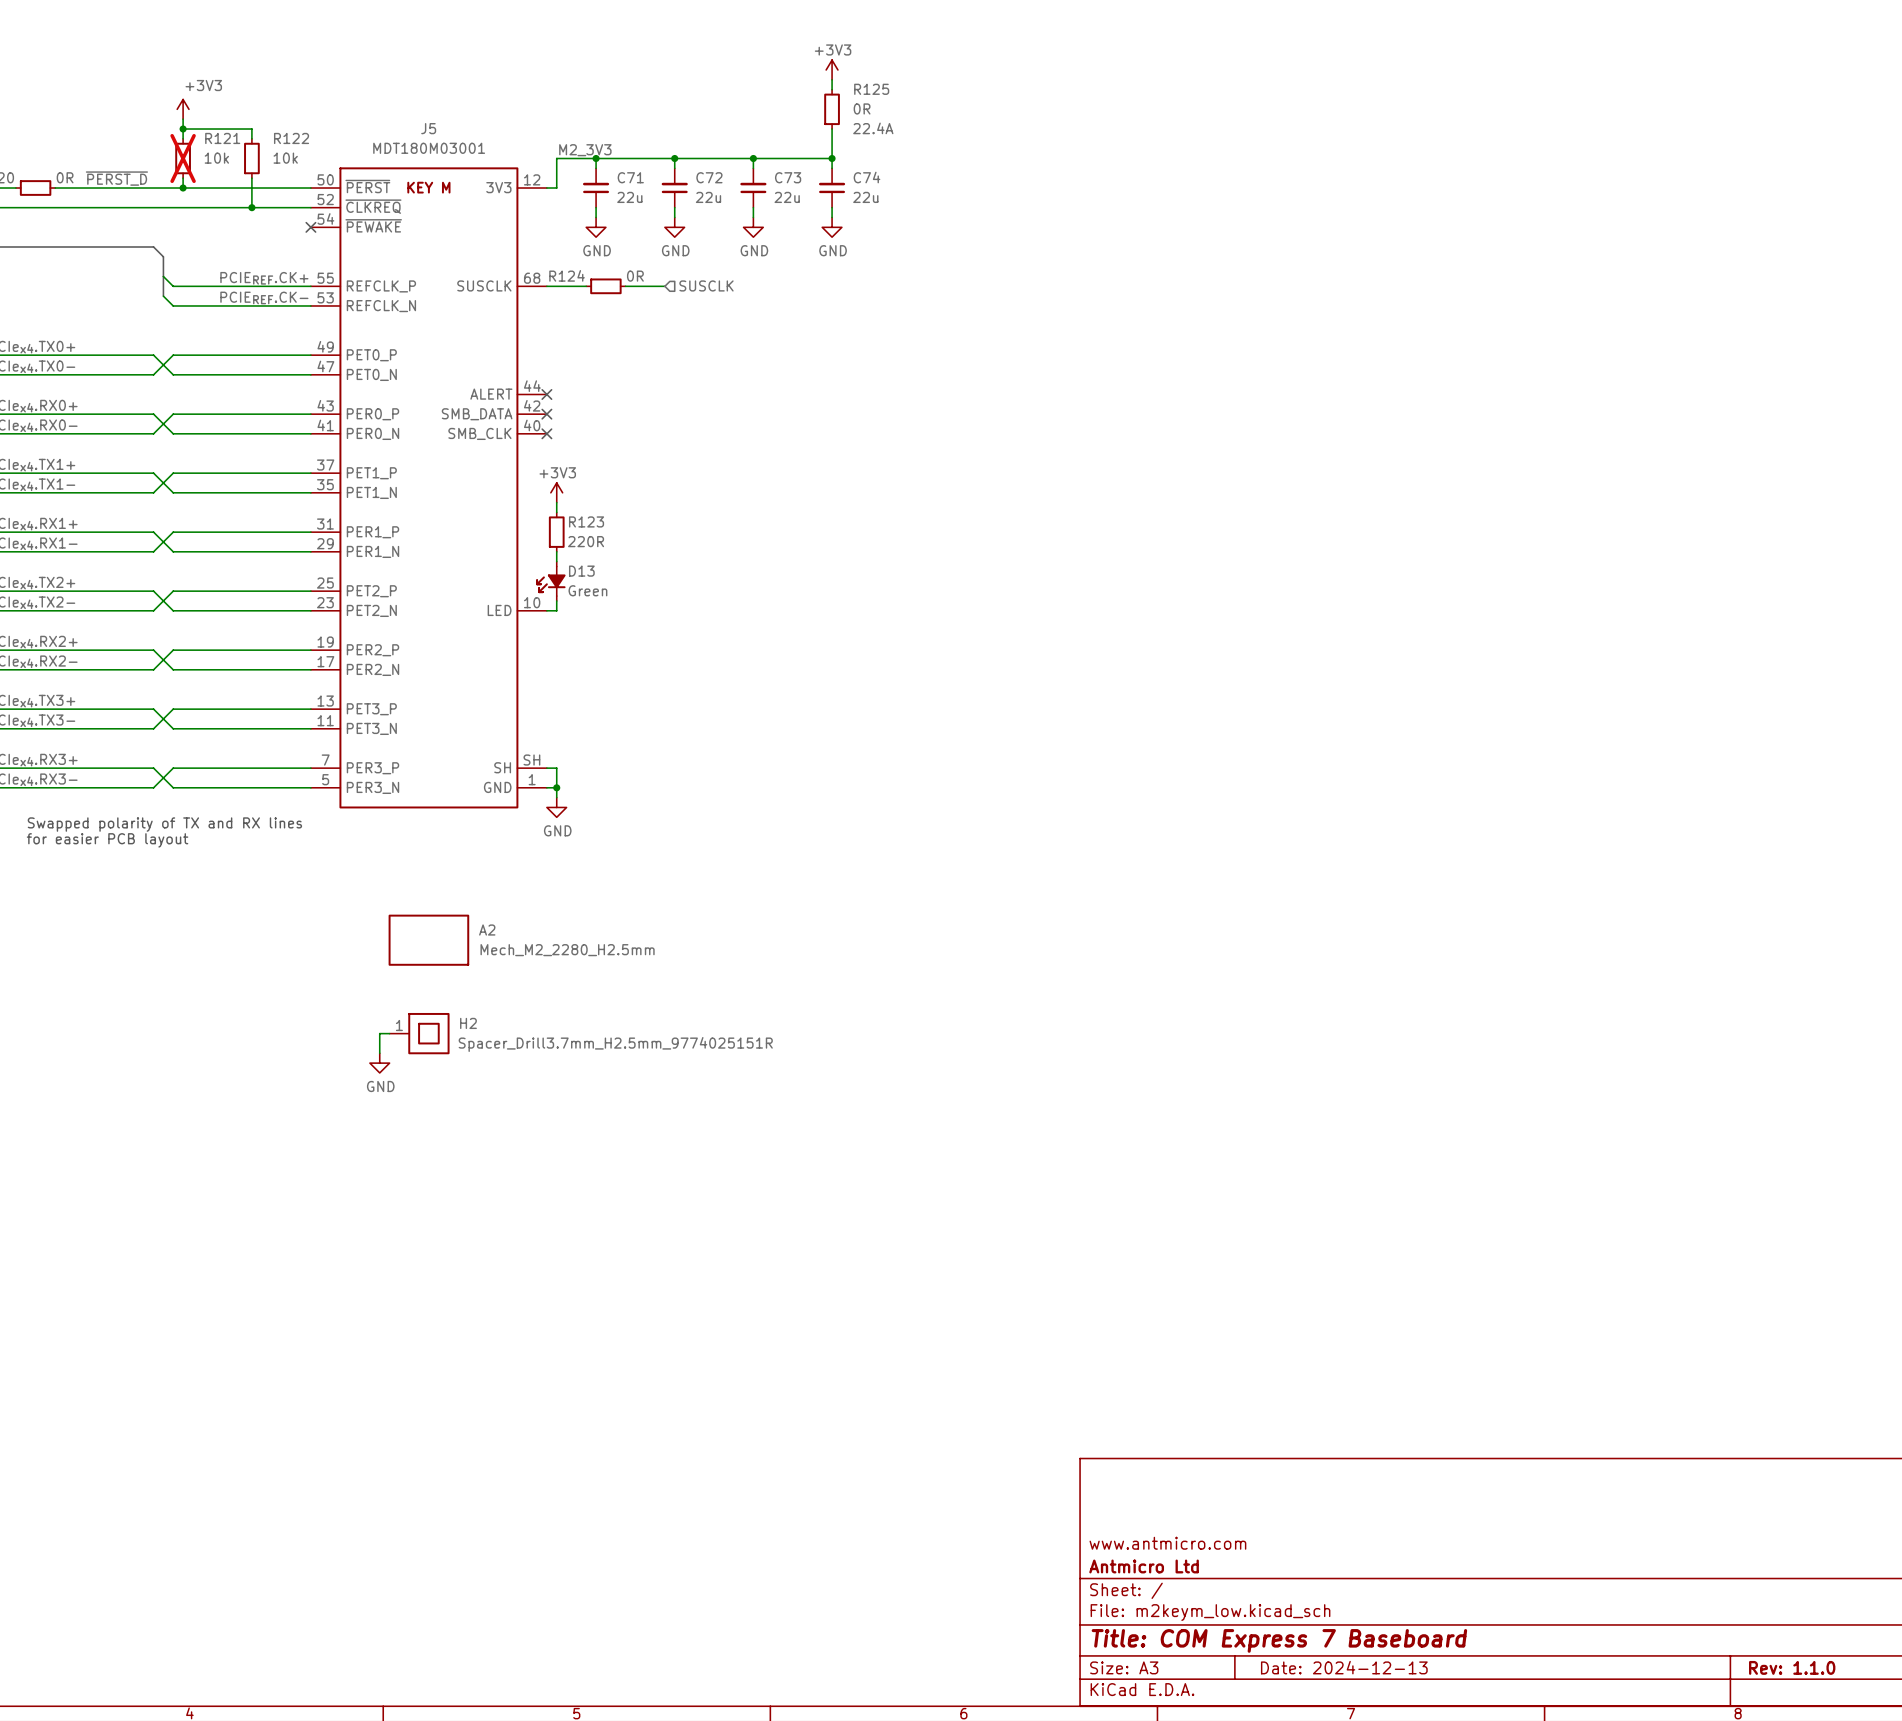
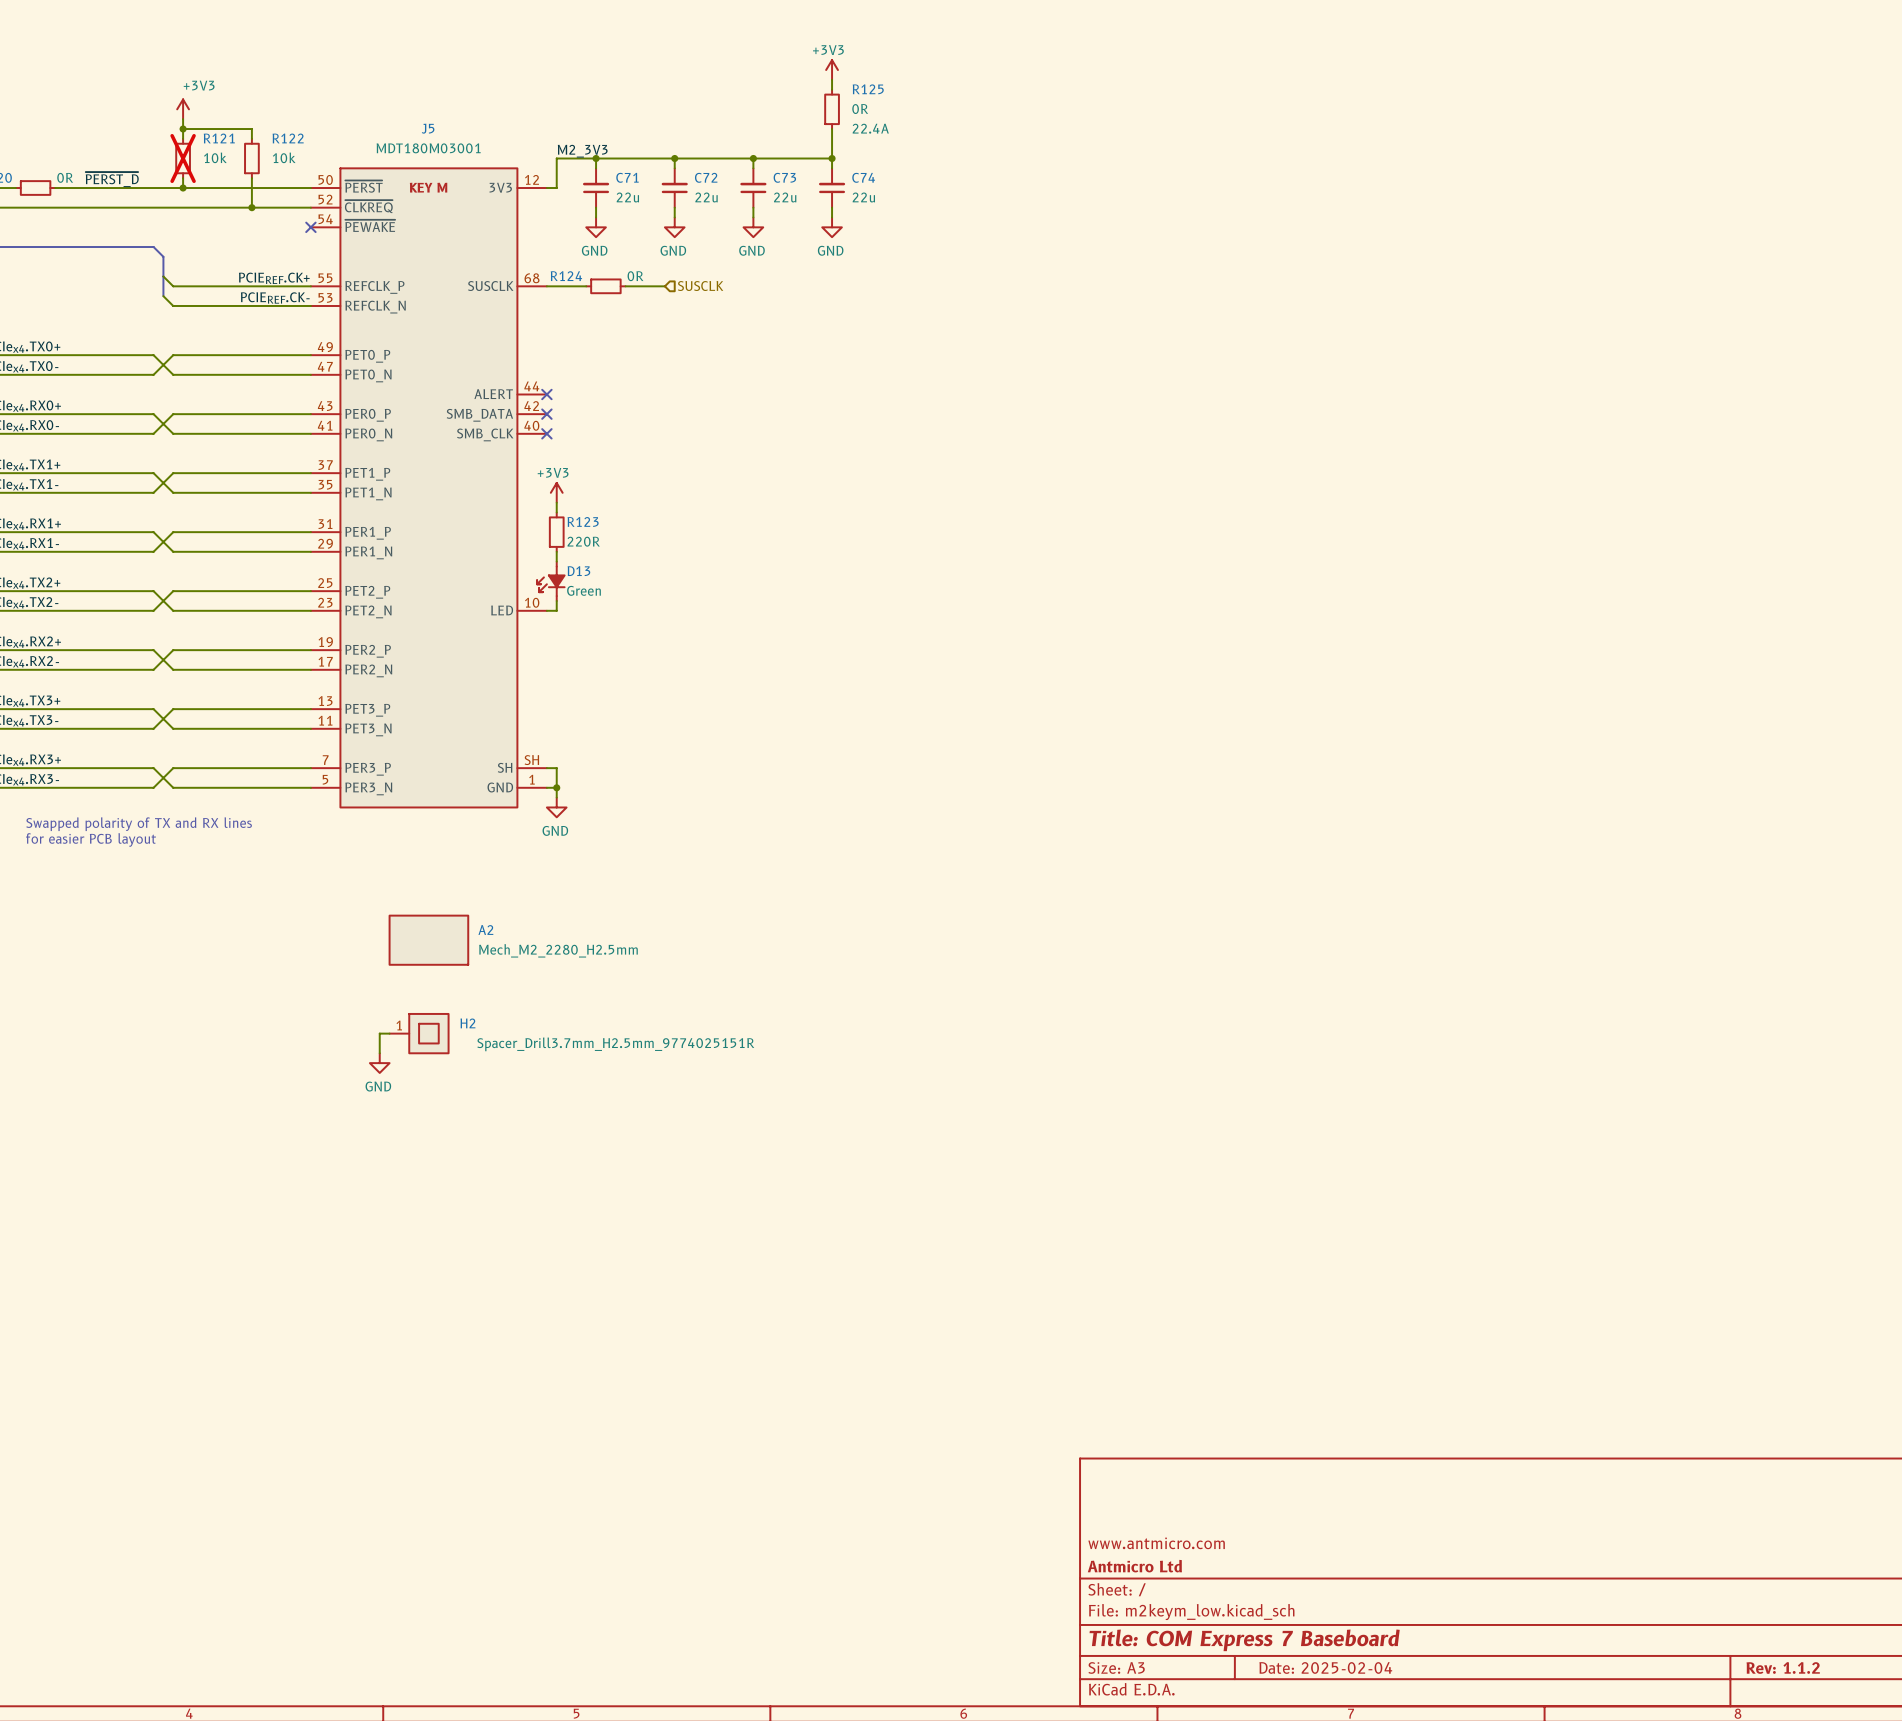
title block: Date: 2024-12-13 (1344, 1667) -> Date: 2025-02-04 (1325, 1667)
title block: Rev: 1.1.0 (1792, 1667) -> Rev: 1.1.2 (1783, 1668)

